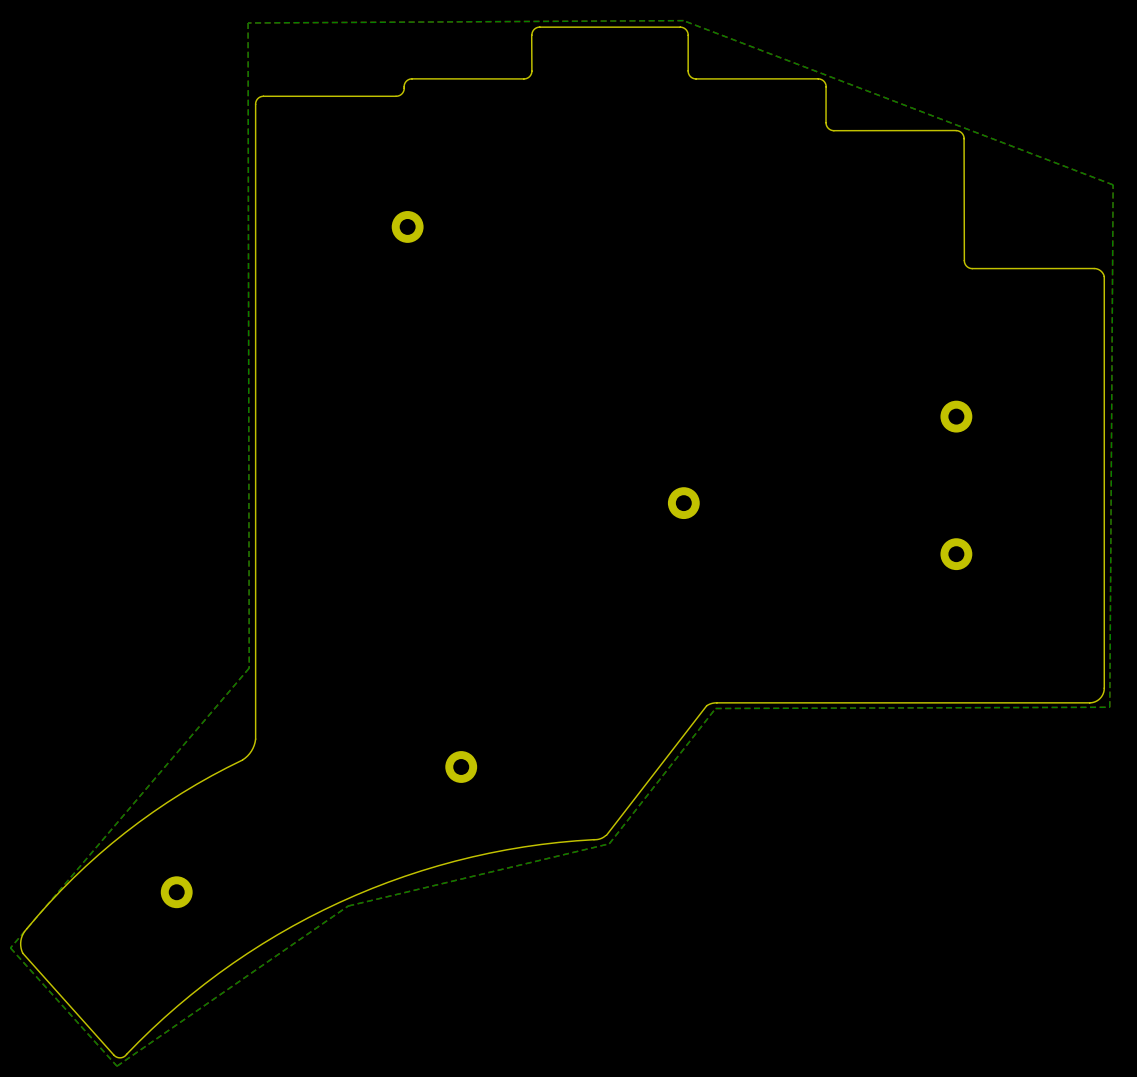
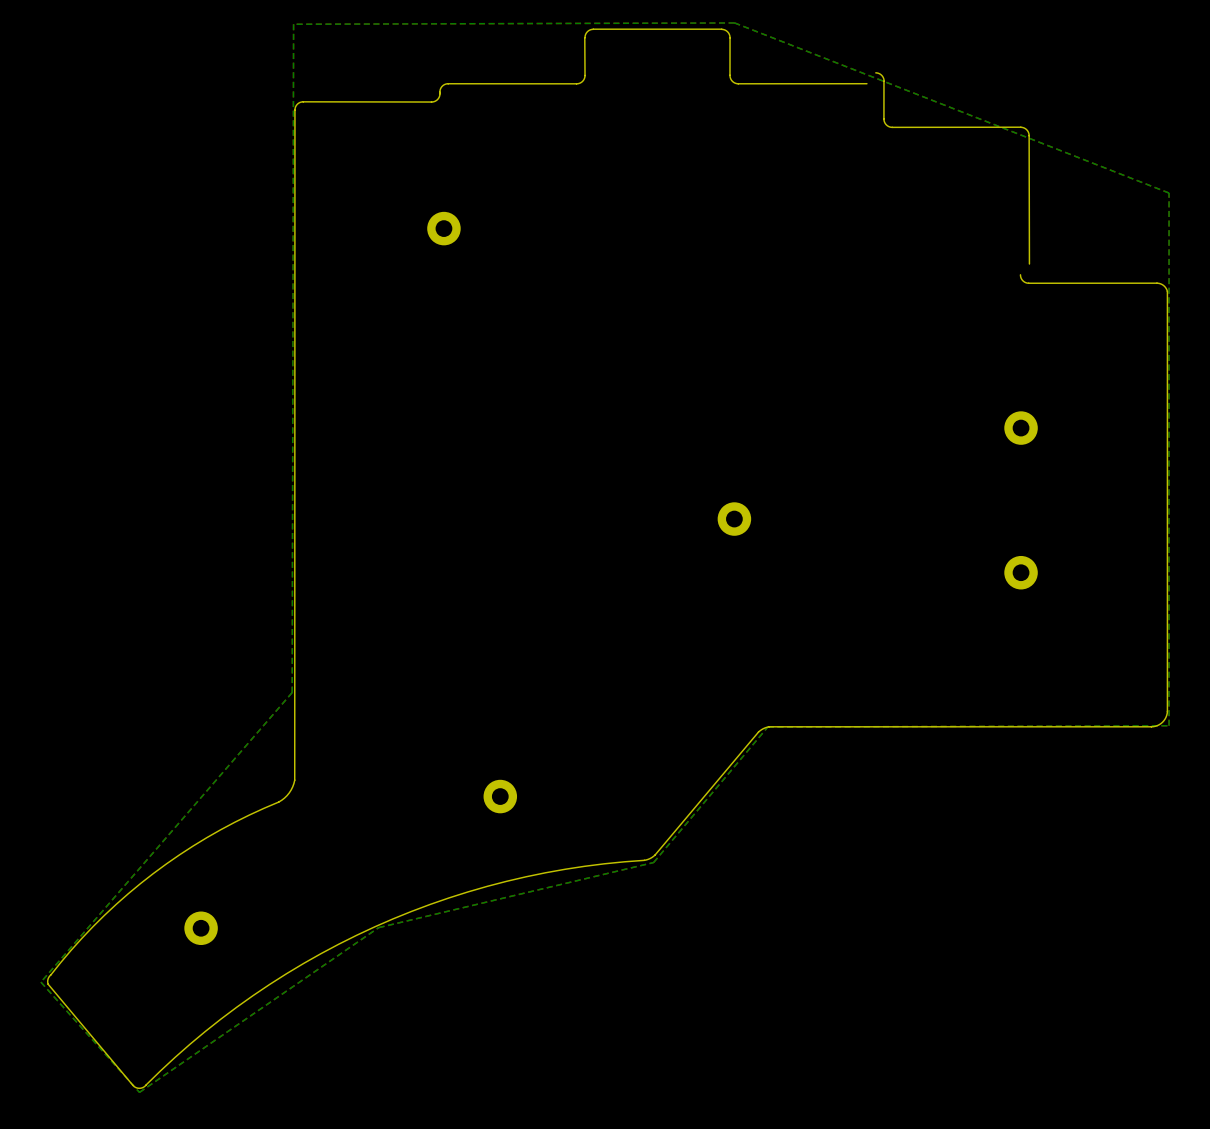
bottom zone outline: (683, 20) (248, 22) (249, 668) (10, 947) (116, 1066) (348, 906) (609, 843) (715, 708) (1109, 707) (1113, 184) (683, 20) -> (734, 22) (1169, 193) (1169, 725) (767, 727) (653, 862) (378, 927) (139, 1092) (40, 982) (292, 692) (293, 24) (734, 22)
board edge: (531, 35) (533, 30) (538, 27) (681, 27) (687, 33) (688, 71) (693, 78) (818, 78) -> none
board edge: (531, 35) (531, 71) (526, 78) (411, 78) -> none
board edge: none -> (593, 29) (587, 31) (585, 37)
board edge: none -> (721, 29) (593, 29)
board edge: none -> (721, 29) (726, 31) (729, 35) (730, 76) (735, 83) (866, 83)
board edge: none -> (584, 37) (584, 76) (579, 83) (448, 83)
board edge: (412, 78) (405, 82) (401, 93) (396, 96) -> none
board edge: none -> (448, 83) (441, 86) (439, 97) (433, 101) (302, 101) (297, 104) (294, 110)
board edge: (395, 96) (263, 96) (258, 98) (255, 102) (255, 739) (251, 750) (242, 759) -> none
board edge: none -> (294, 110) (294, 780) (291, 789) (281, 800) (206, 837) (140, 883) (93, 926) (48, 977) (48, 984) (132, 1085) (137, 1088) (144, 1086) (190, 1044) (253, 995) (321, 953) (374, 926) (448, 897) (506, 881) (565, 869) (644, 860) (651, 857) (758, 732) (765, 727) (1151, 726) (1162, 722) (1167, 711) (1167, 290) (1162, 284) (1156, 283) (1027, 283) (1022, 280) (1020, 274)
board edge: (964, 260) (966, 266) (971, 268) (1094, 268) (1100, 270) (1103, 275) (1104, 688) (1102, 695) (1097, 700) (1089, 702) (711, 703) (706, 705) (606, 835) -> none
board edge: (242, 760) (181, 793) (125, 832) (73, 878) (37, 915) (22, 935) (20, 945) (22, 953) (113, 1054) -> none
board edge: (605, 835) (597, 839) (524, 846) (455, 861) (404, 876) (339, 902) (292, 926) (247, 953) (177, 1006) (124, 1056) (119, 1057) (113, 1054) -> none

